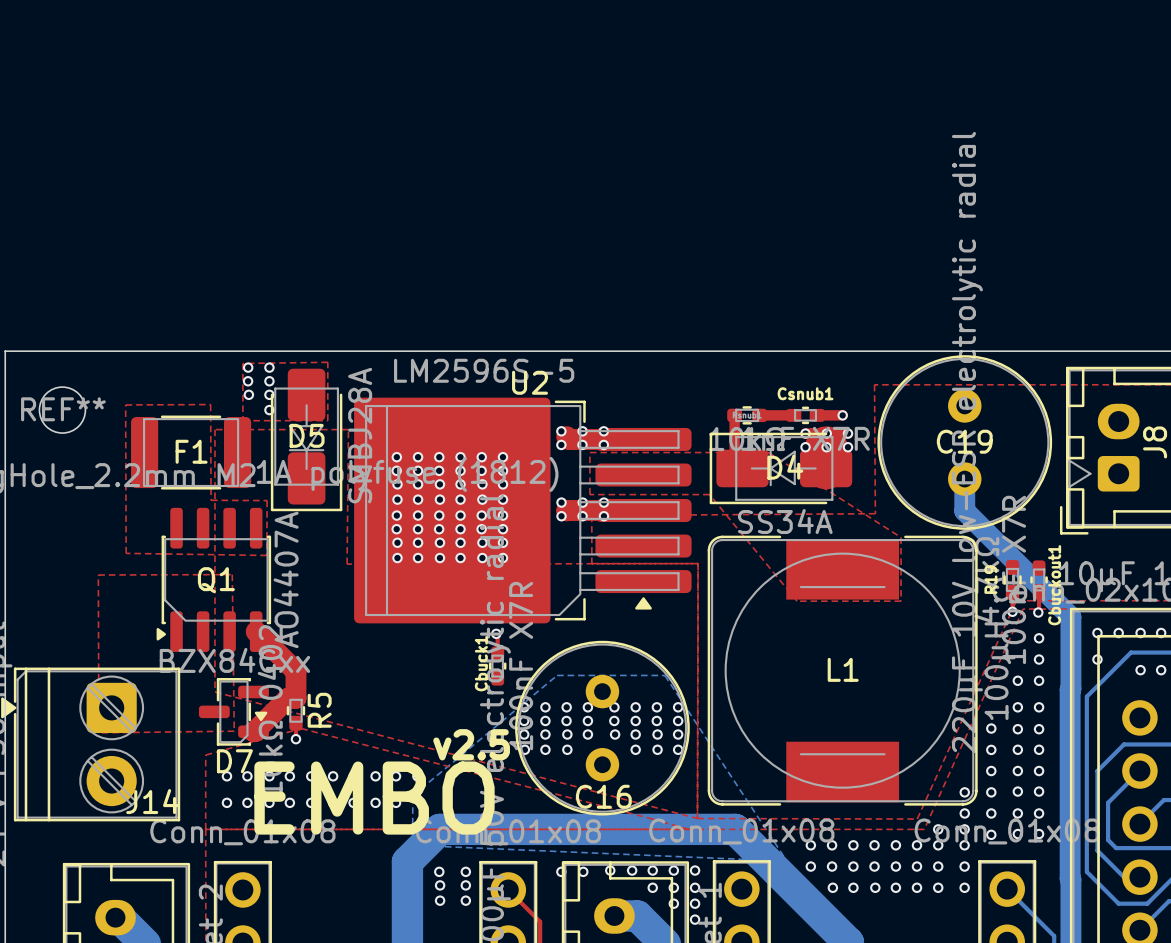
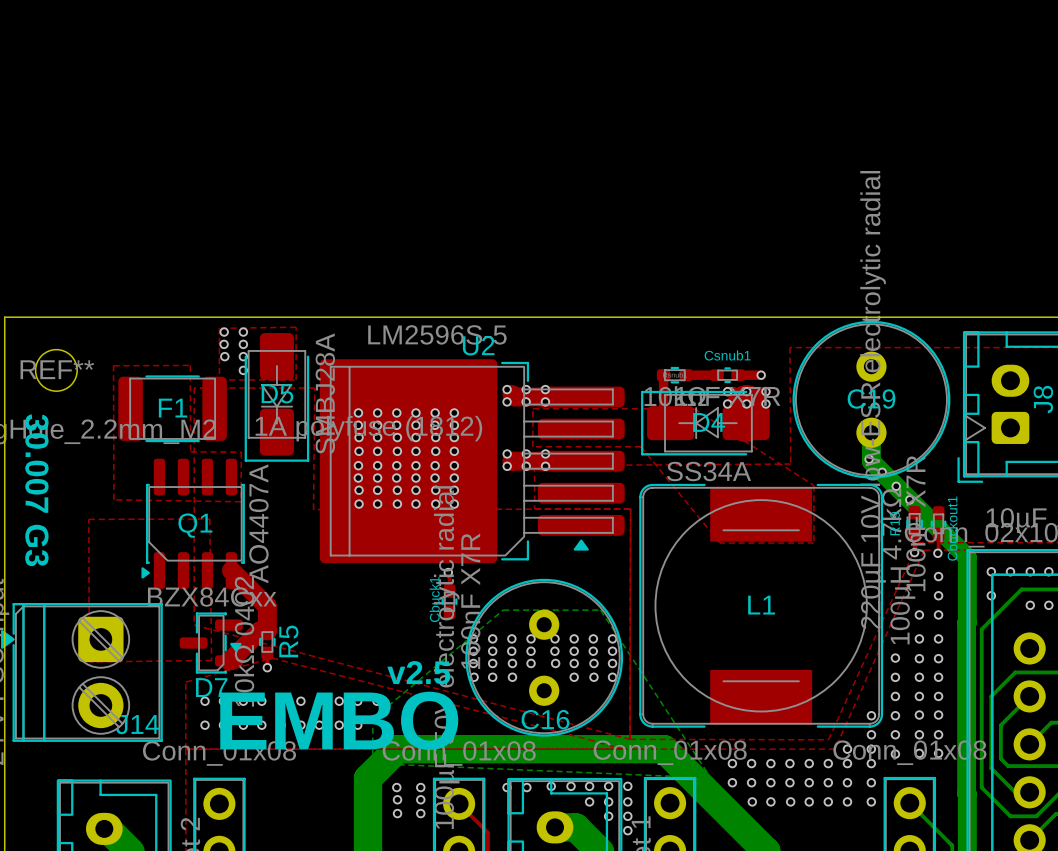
via: none -> (869, 459)
via: none -> (882, 472)
via: none -> (896, 486)
via: none -> (909, 499)
text: none -> 30.007 G3 (36, 490)

